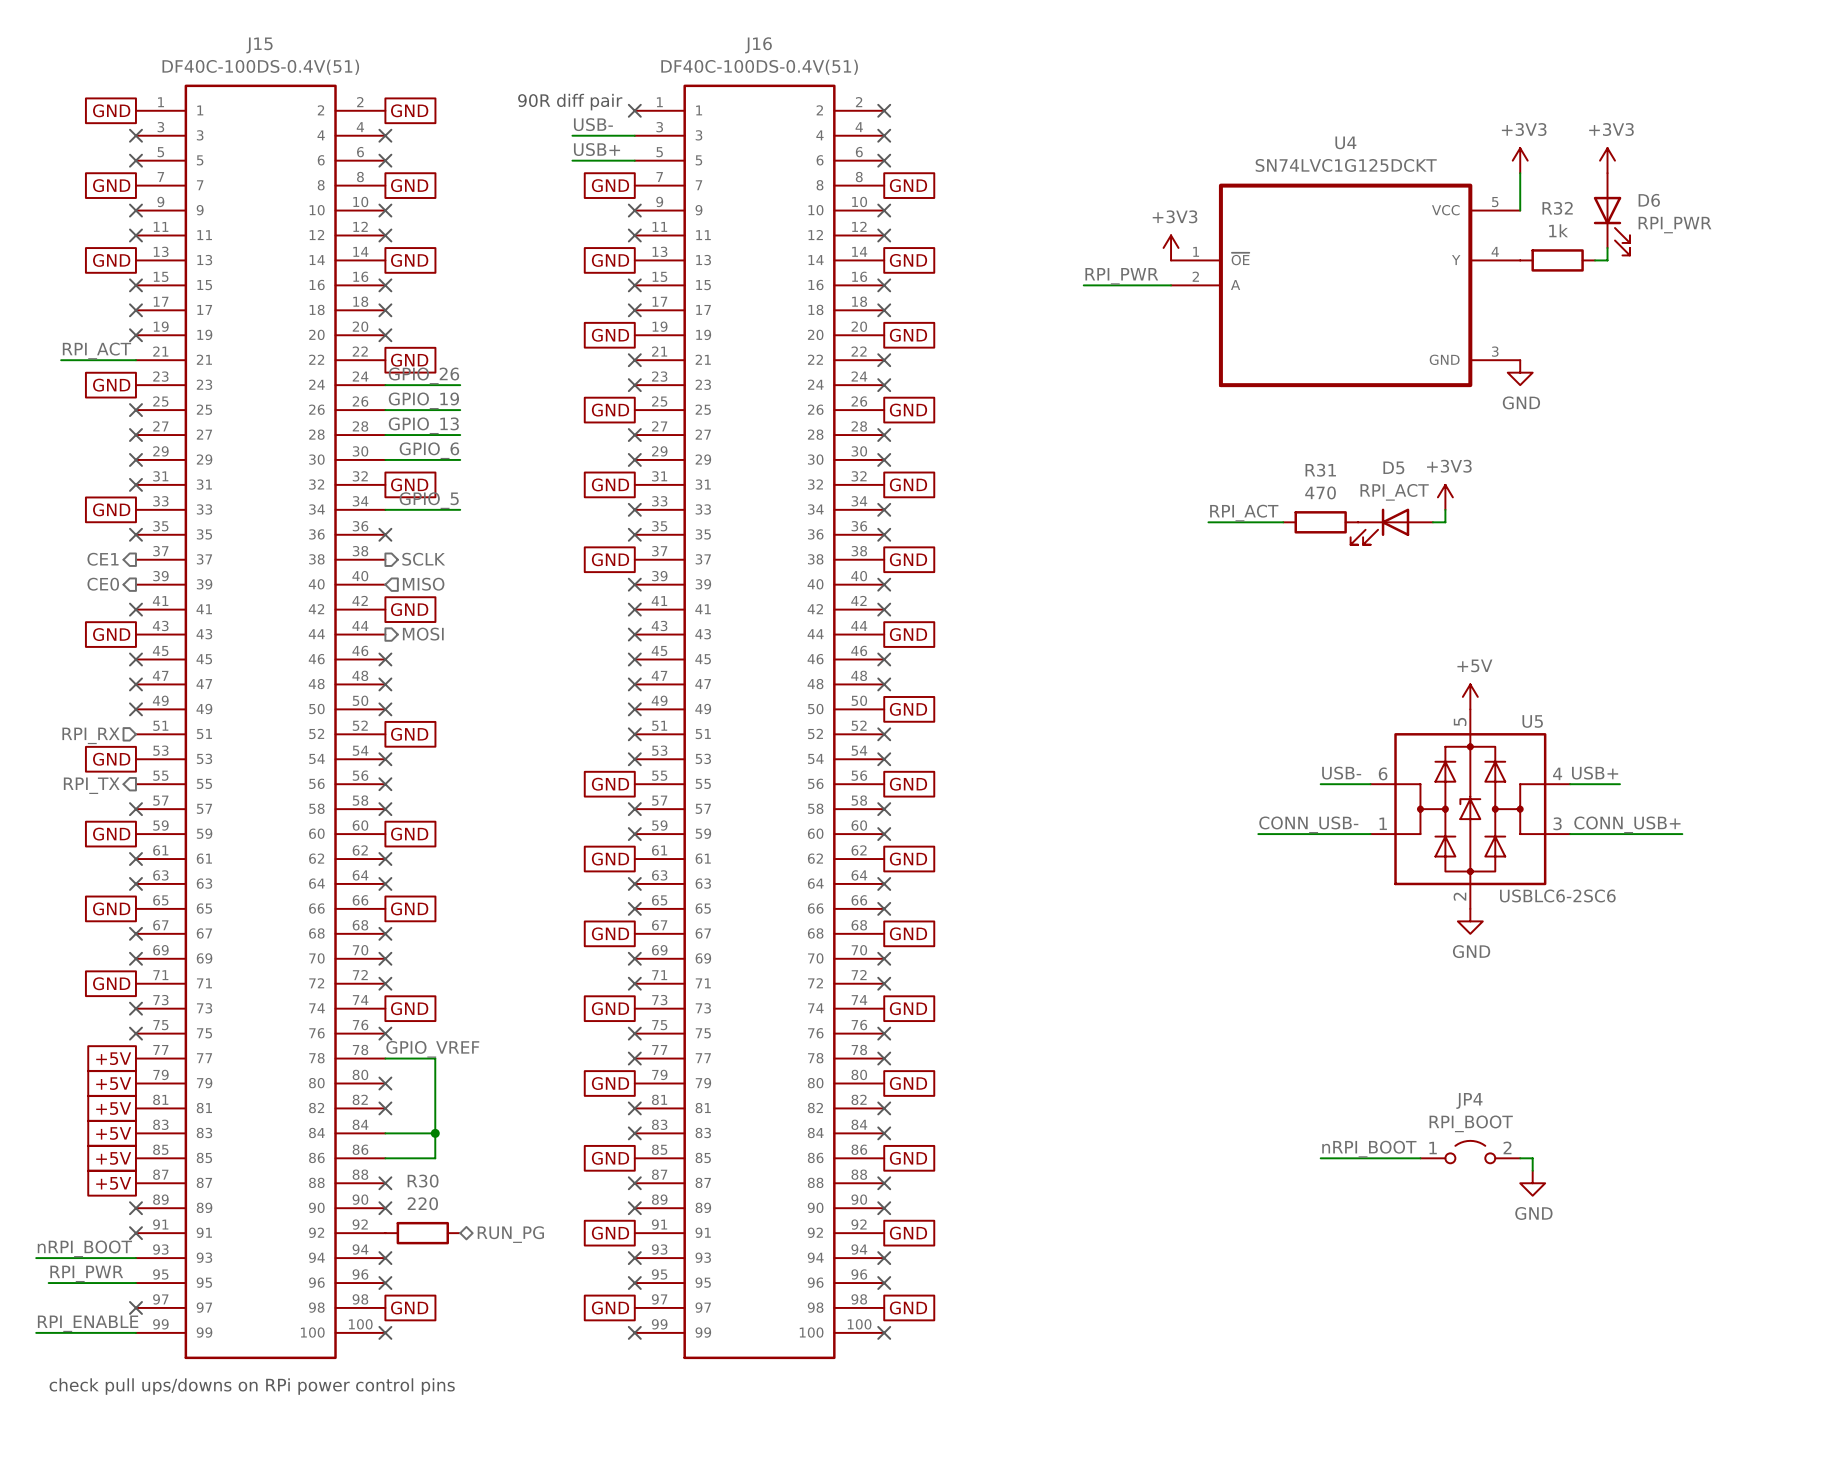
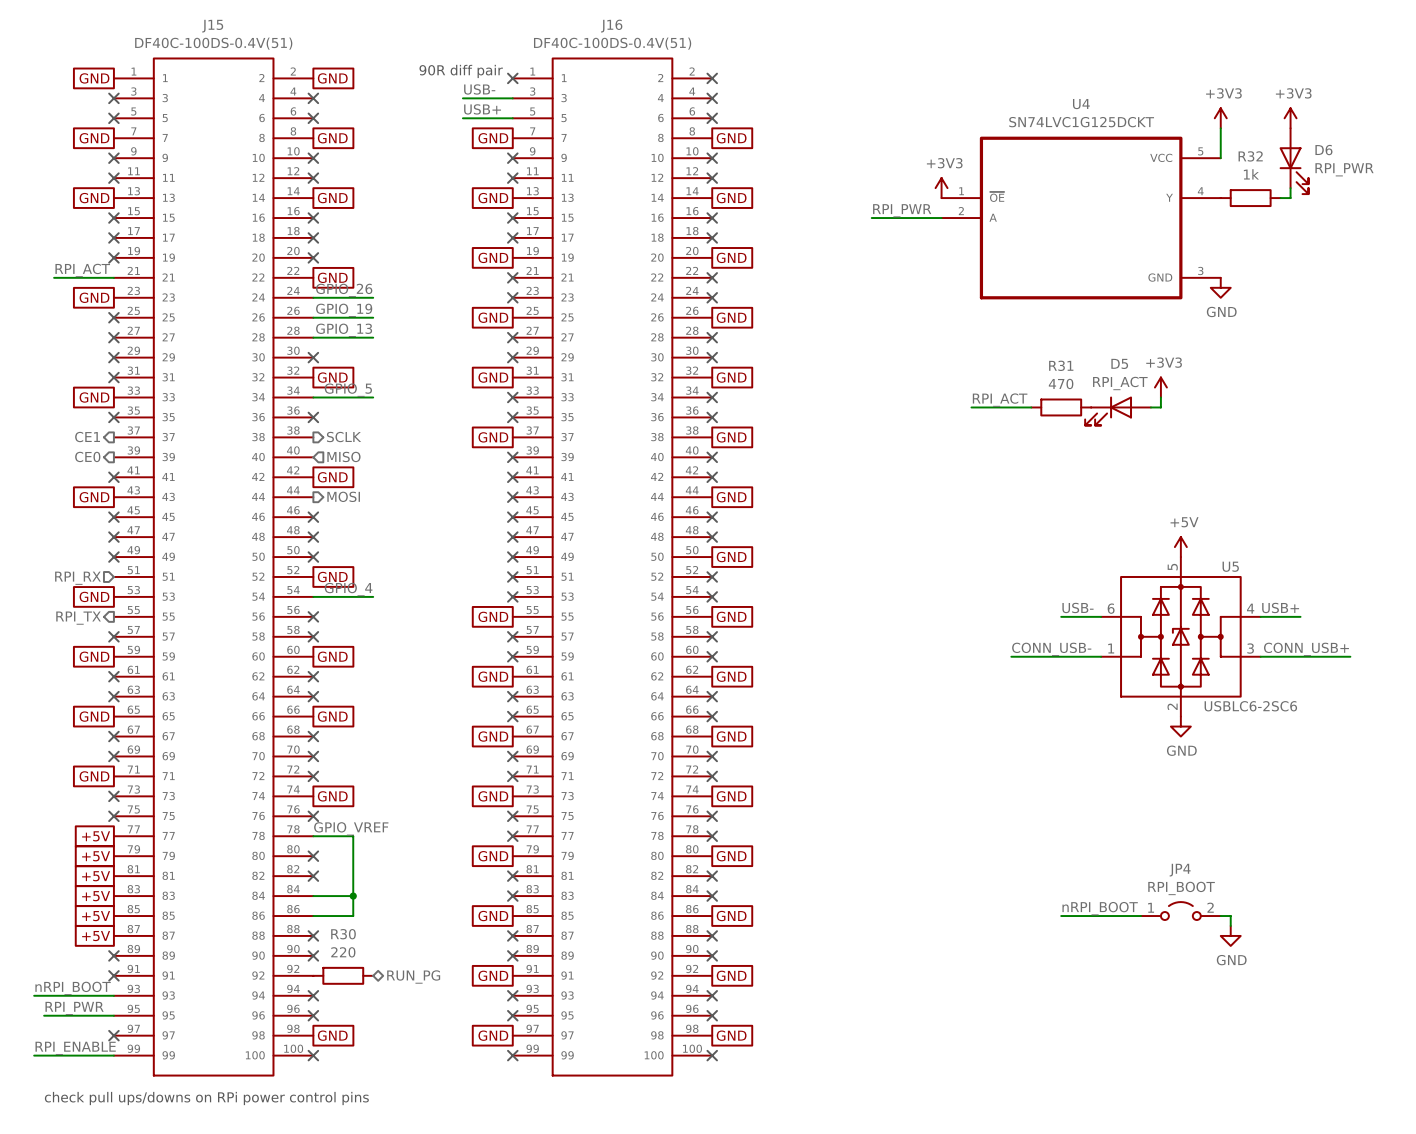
label: GPIO_6 (429, 450) -> none
wire: (385, 459) (460, 459) -> none
no-connect mark: none -> (313, 357)
label: none -> GPIO_4 (348, 589)
wire: none -> (313, 596) (373, 596)
no-connect mark: (385, 759) -> none

